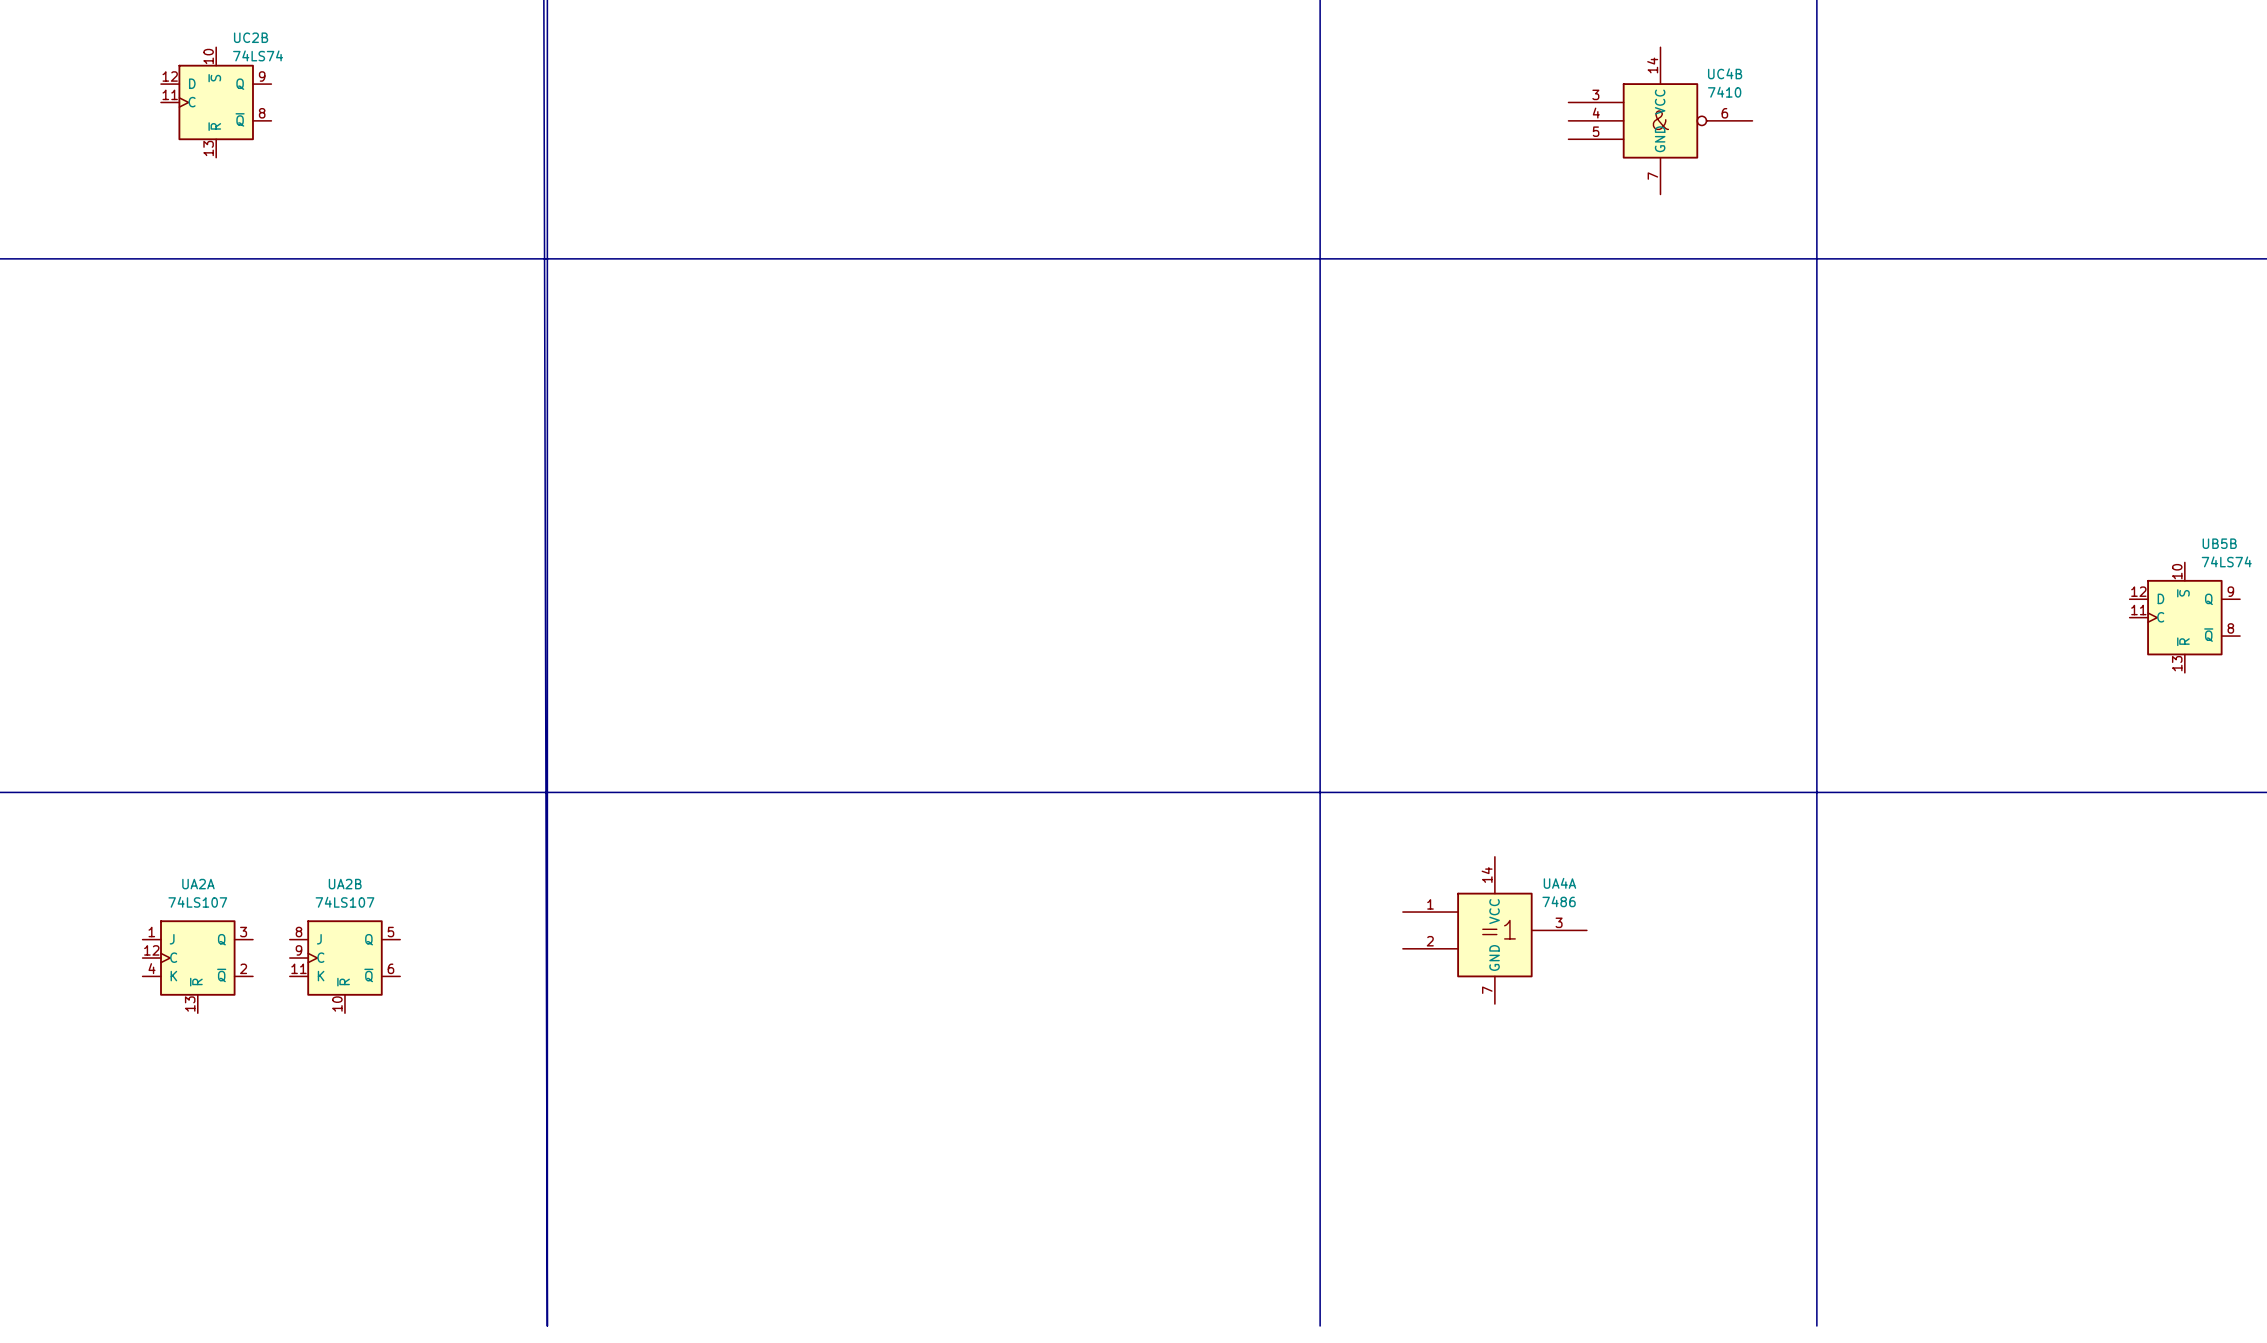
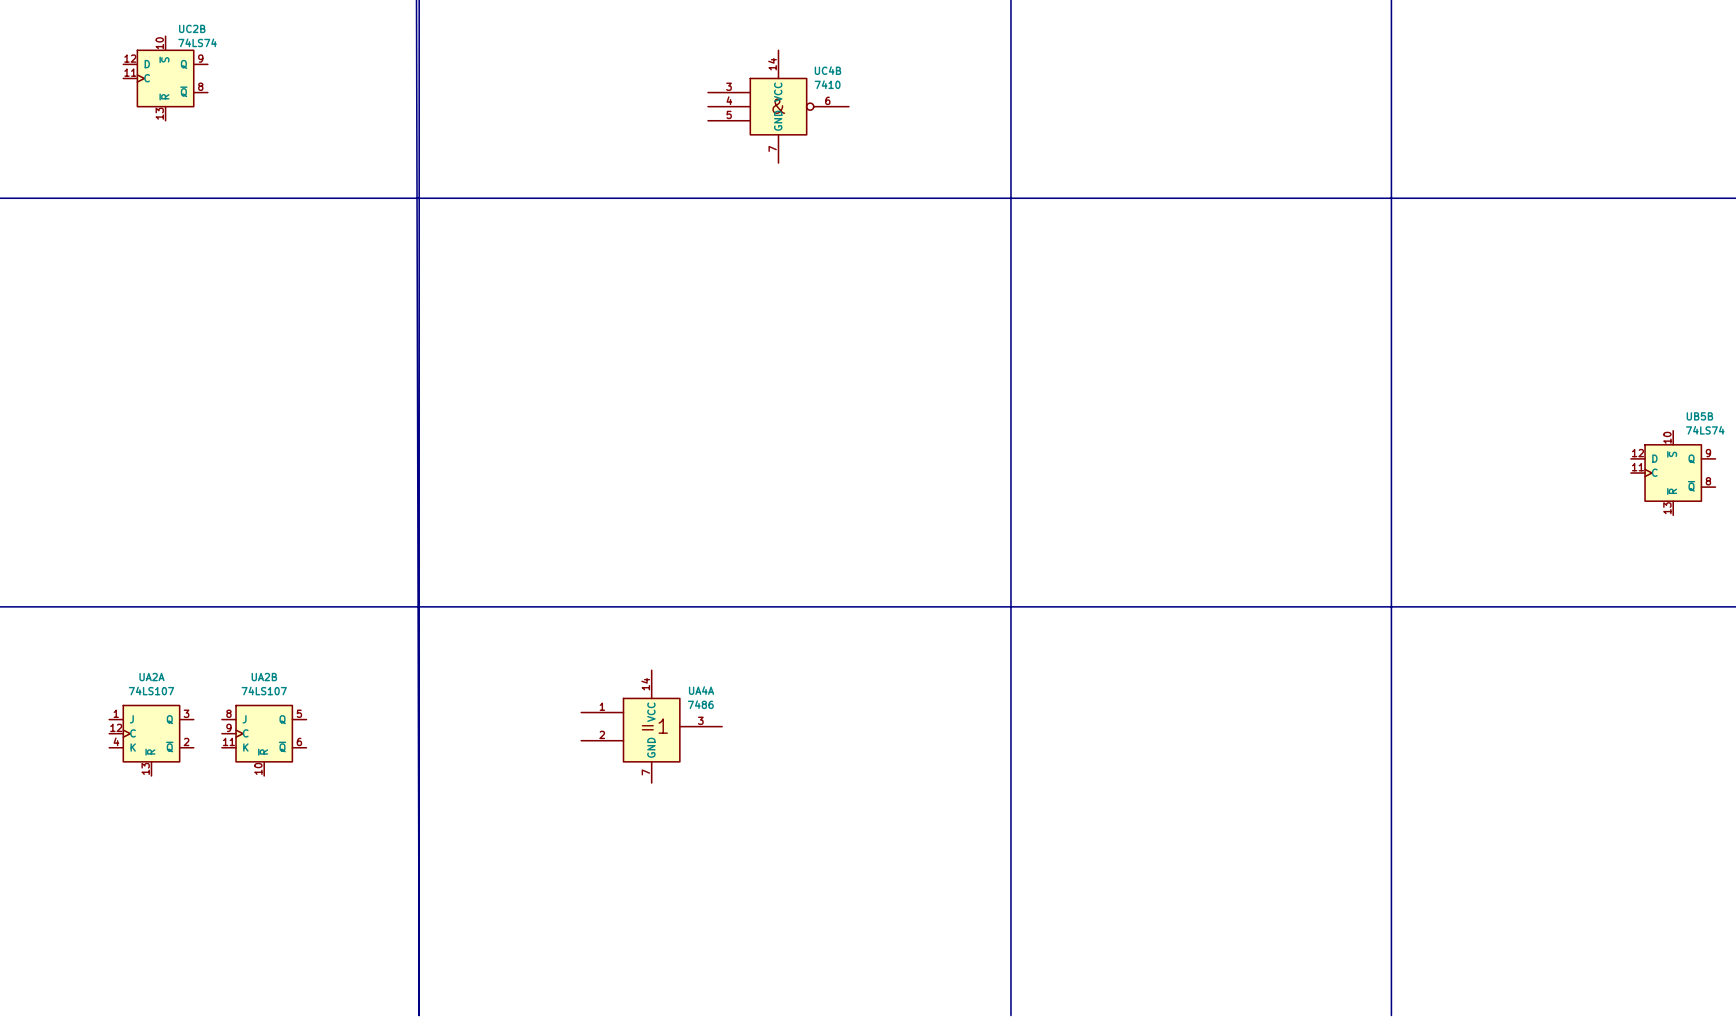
UC4B position: (1660, 120) -> (778, 106)
UA4A position: (1494, 930) -> (651, 726)

